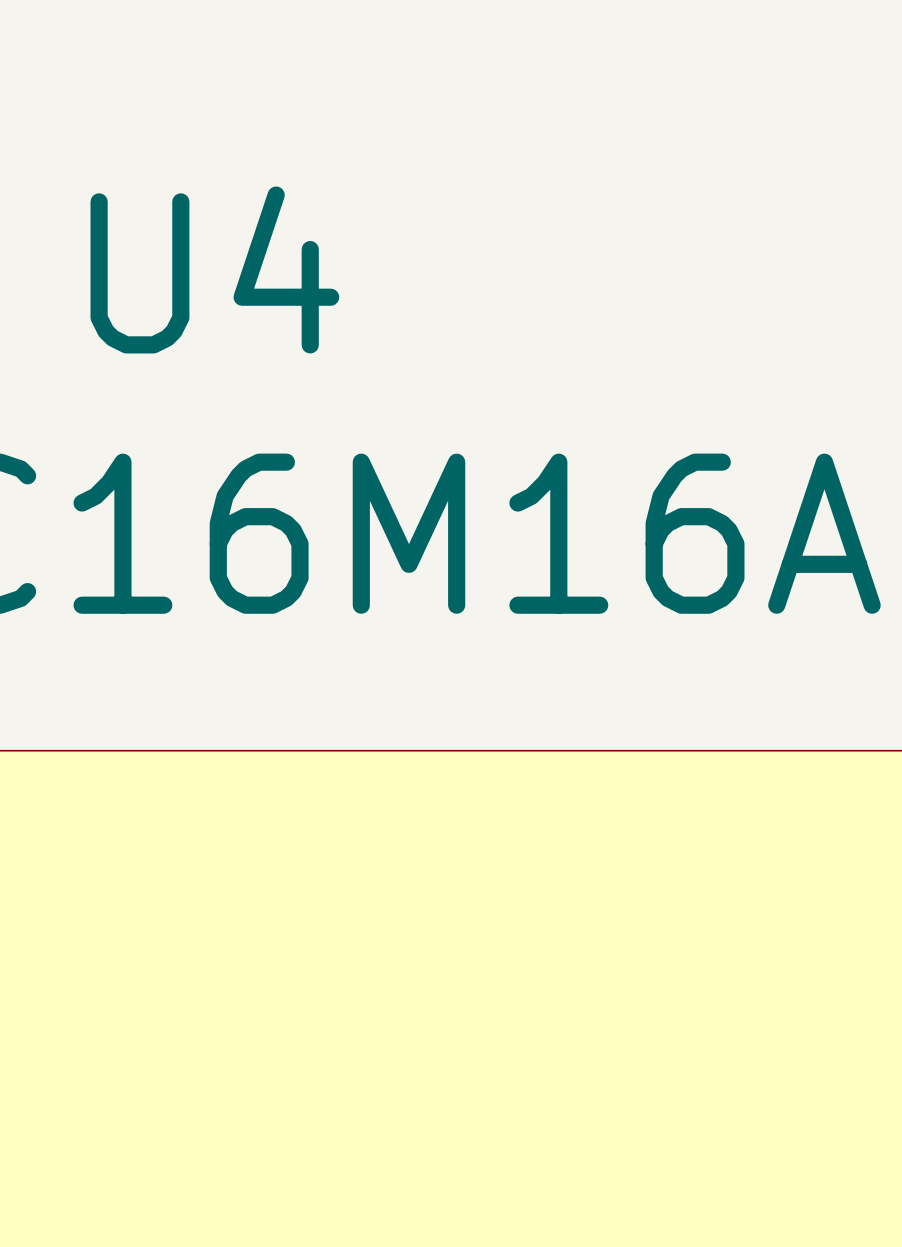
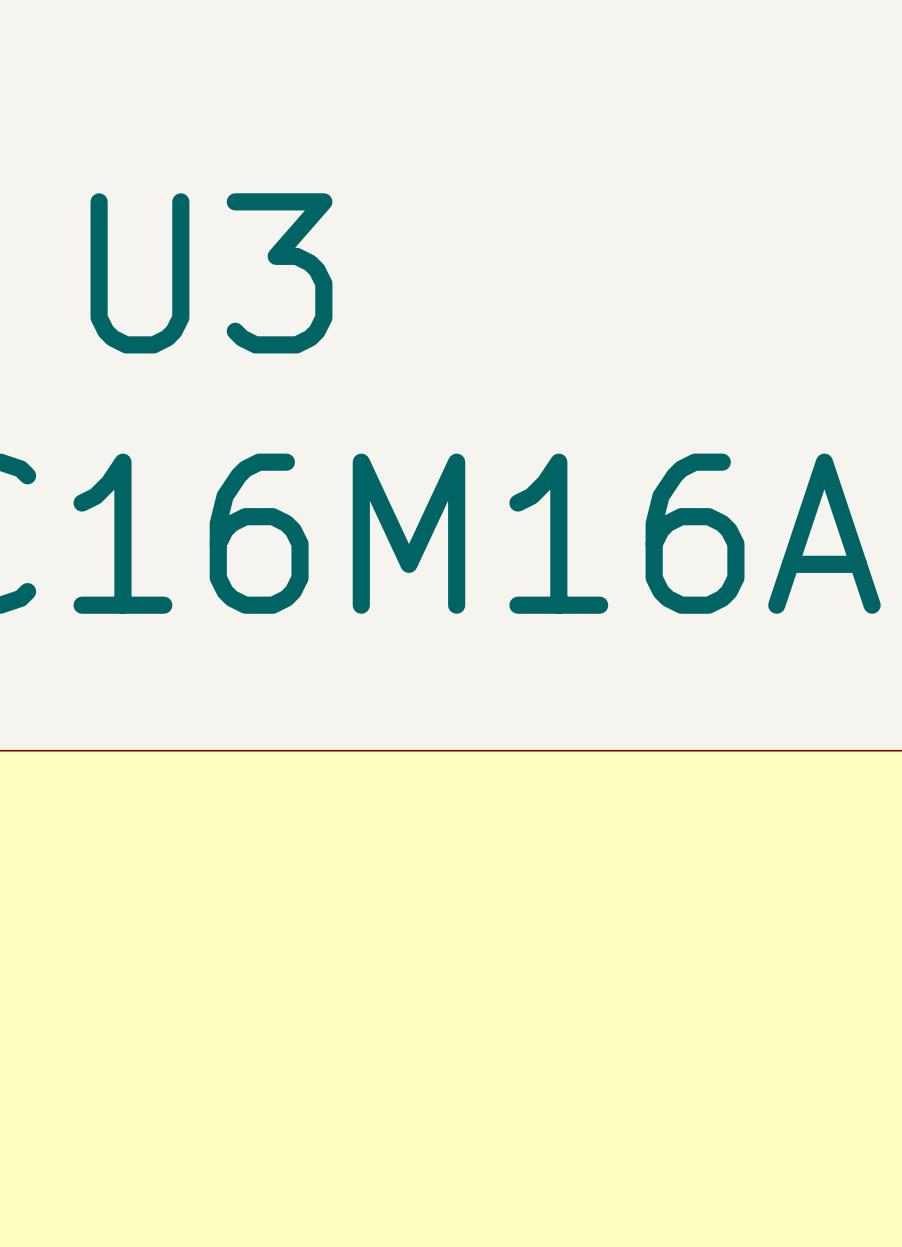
U4 name: U4 (214, 269) -> U3 (211, 273)

